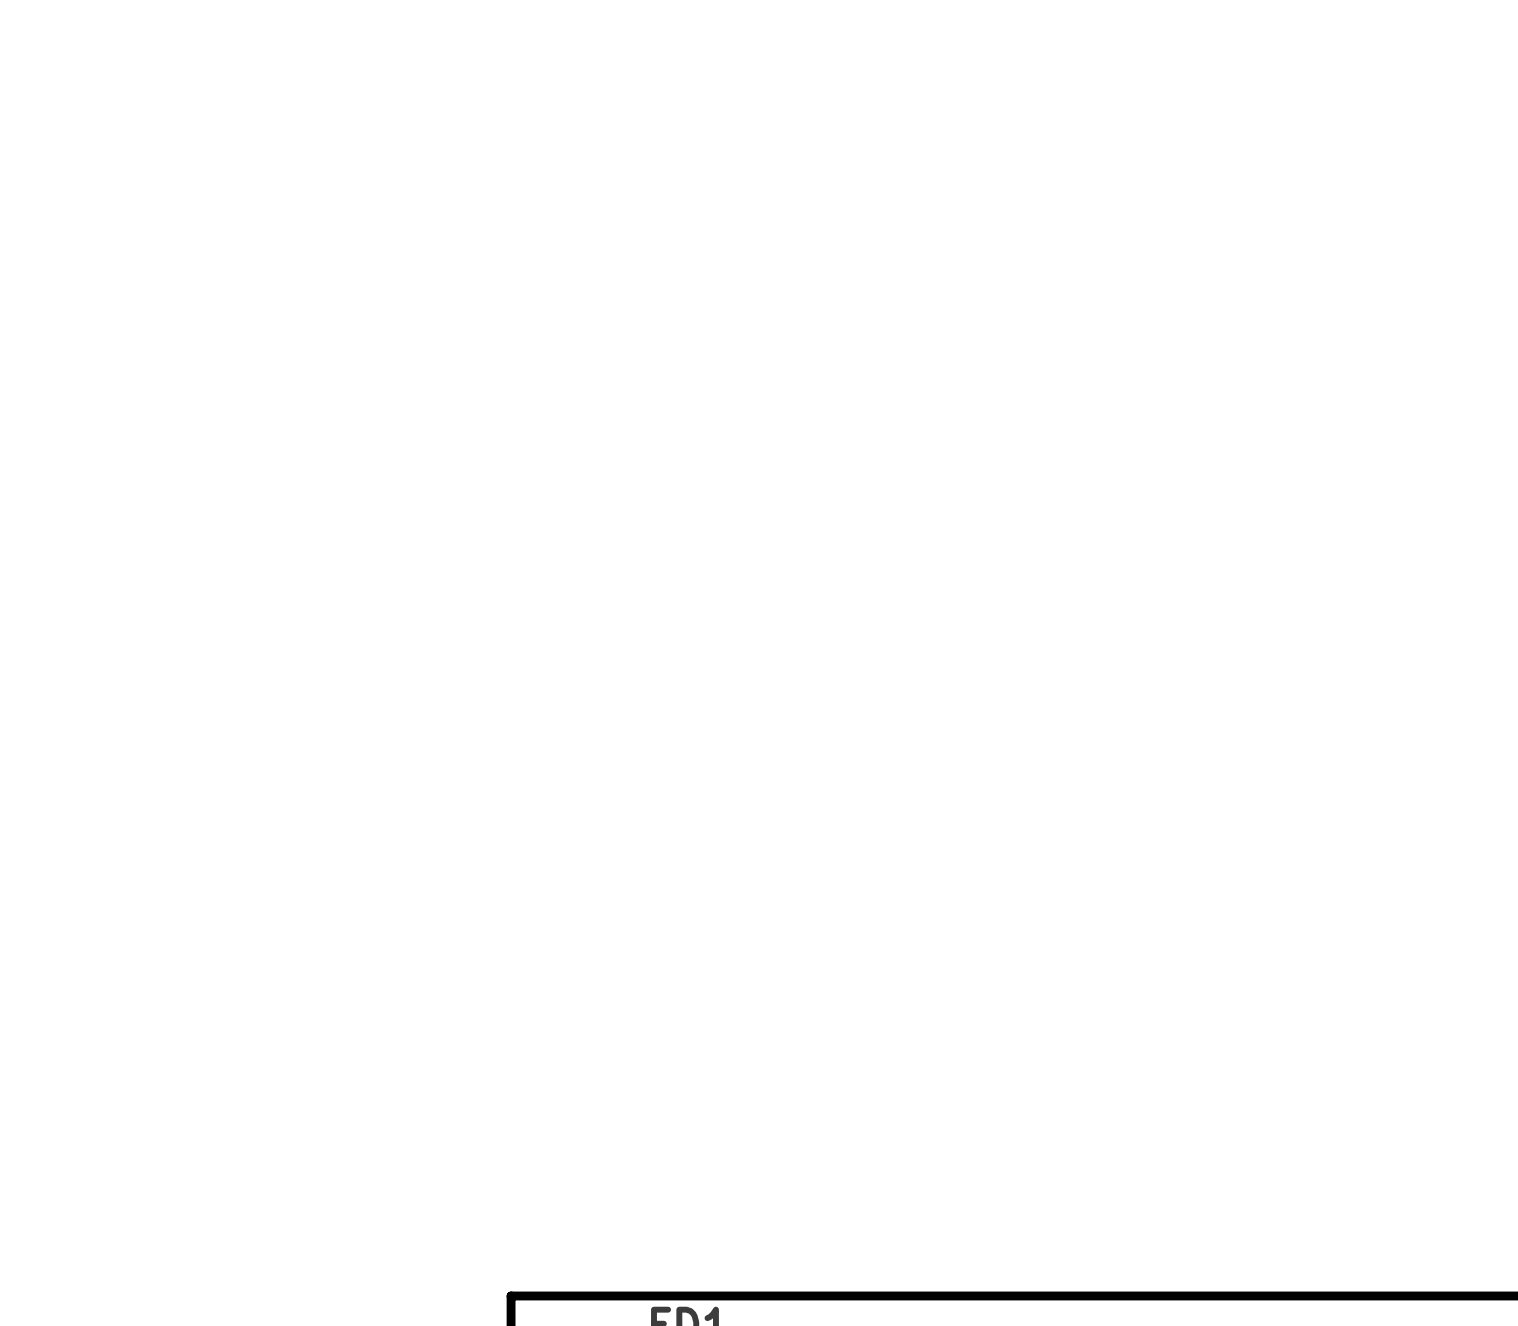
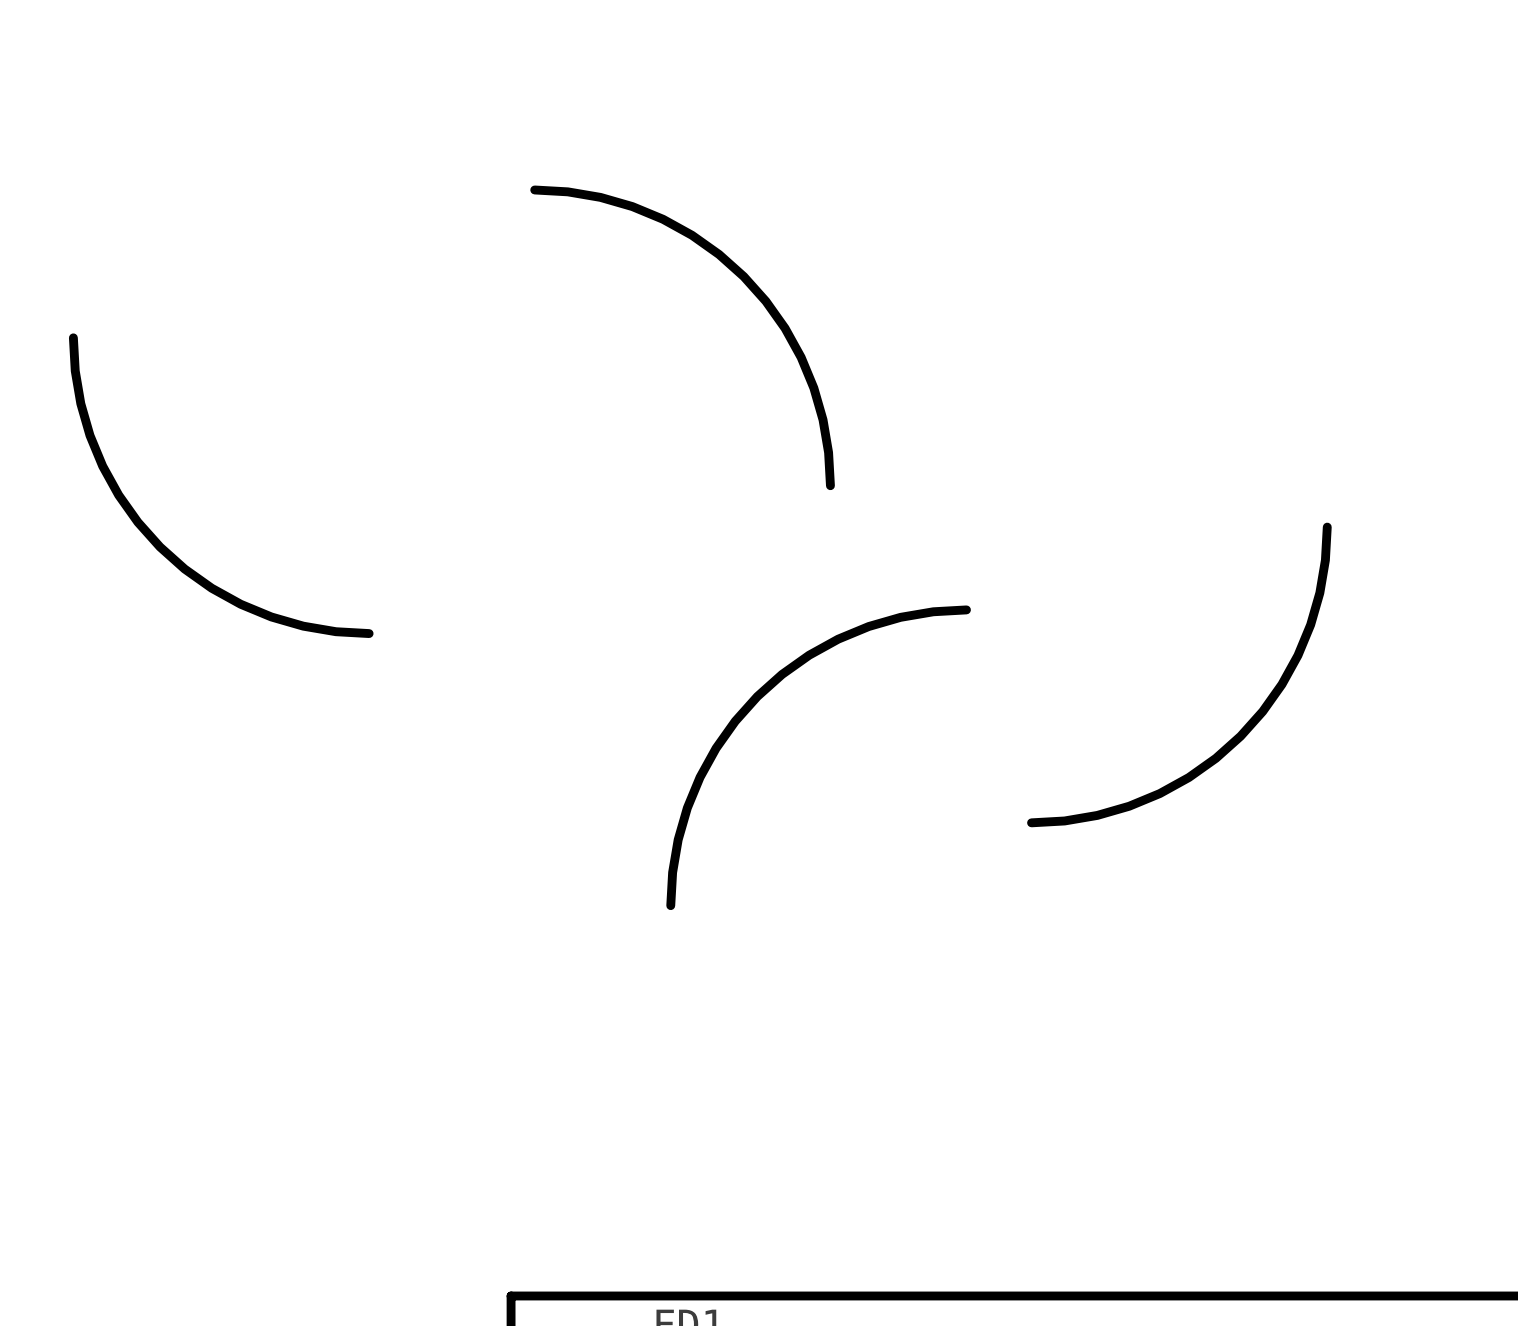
board edge: none -> (534, 189) (567, 191) (600, 197) (632, 206) (663, 219) (692, 235) (719, 254) (743, 276) (765, 301) (785, 328) (801, 357) (813, 388) (823, 419) (828, 452) (830, 485)
board edge: none -> (73, 337) (75, 370) (80, 403) (89, 435) (102, 466) (118, 495) (137, 522) (160, 546) (184, 569) (211, 588) (240, 604) (271, 616) (303, 626) (336, 631) (369, 633)
board edge: none -> (1327, 527) (1325, 560) (1319, 592) (1310, 624) (1297, 655) (1281, 684) (1262, 711) (1240, 736) (1215, 758) (1188, 777) (1159, 793) (1129, 806) (1097, 815) (1064, 820) (1031, 822)
board edge: none -> (966, 609) (933, 611) (900, 617) (868, 626) (838, 639) (809, 655) (782, 674) (757, 696) (735, 721) (716, 748) (700, 777) (687, 807) (678, 839) (672, 872) (670, 905)

